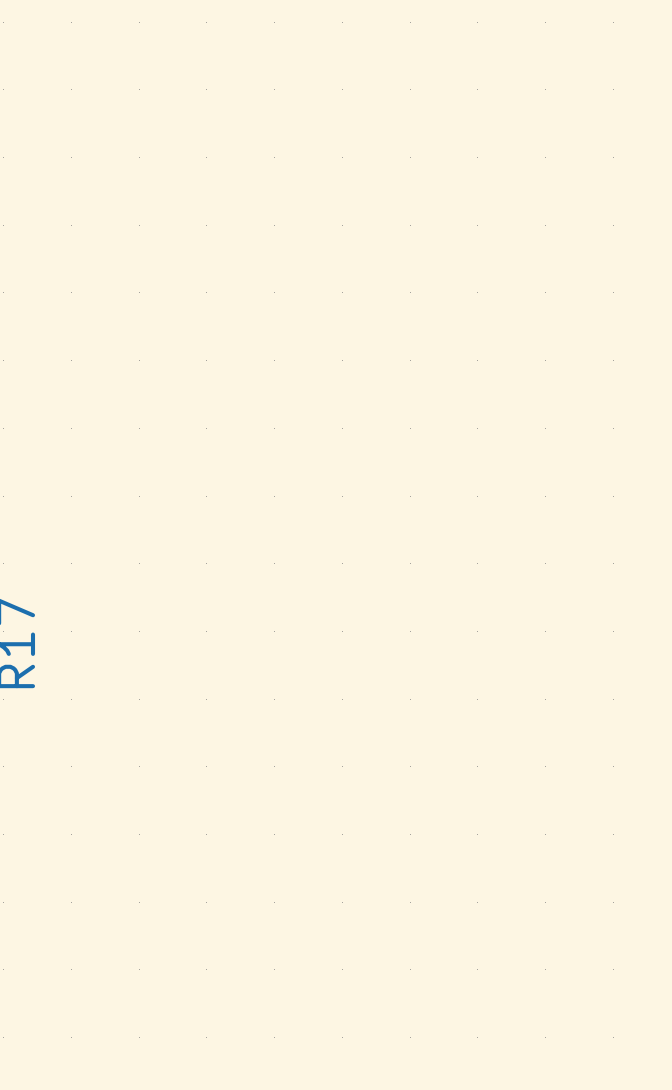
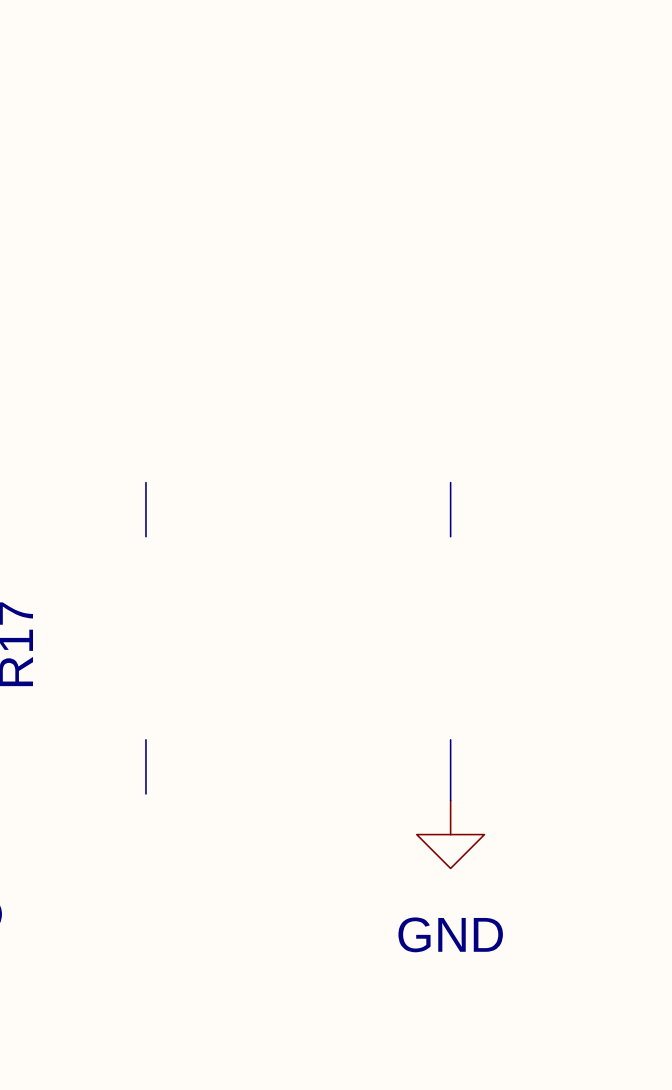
wire: none -> (145, 482) (145, 536)
wire: none -> (450, 482) (450, 536)
wire: none -> (145, 739) (145, 793)
wire: none -> (450, 739) (450, 800)
power symbol: none -> GND (450, 834)

